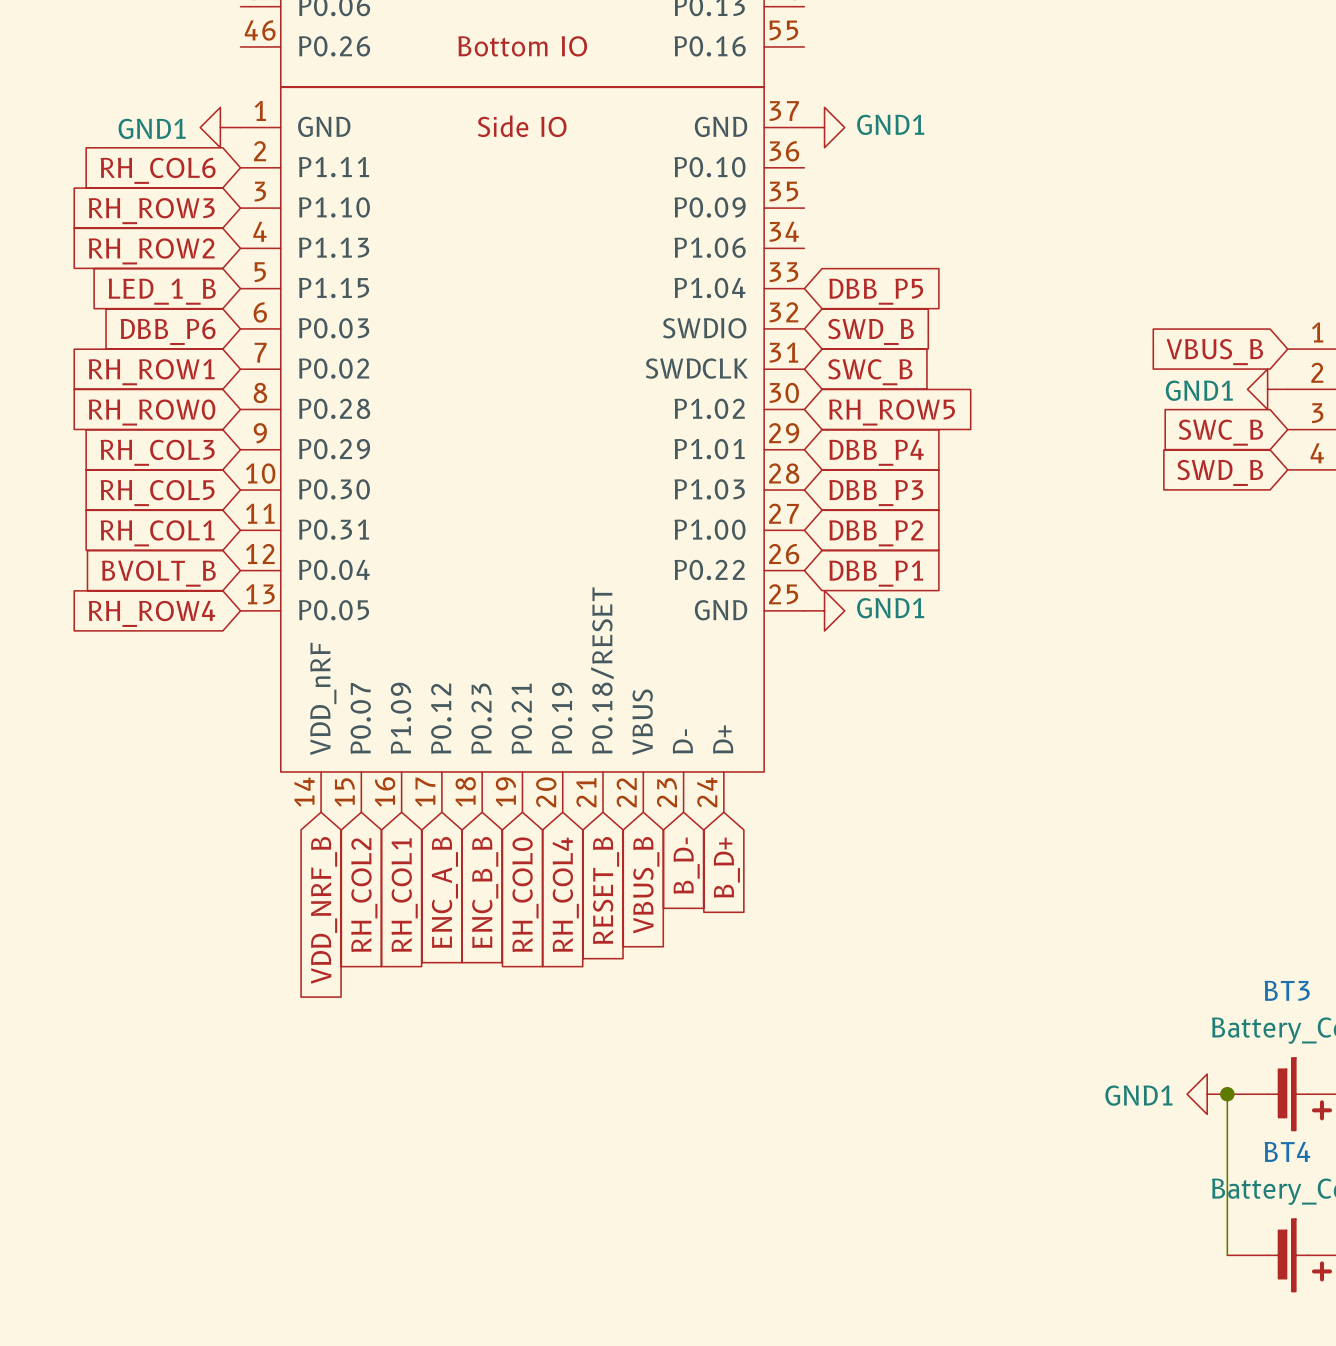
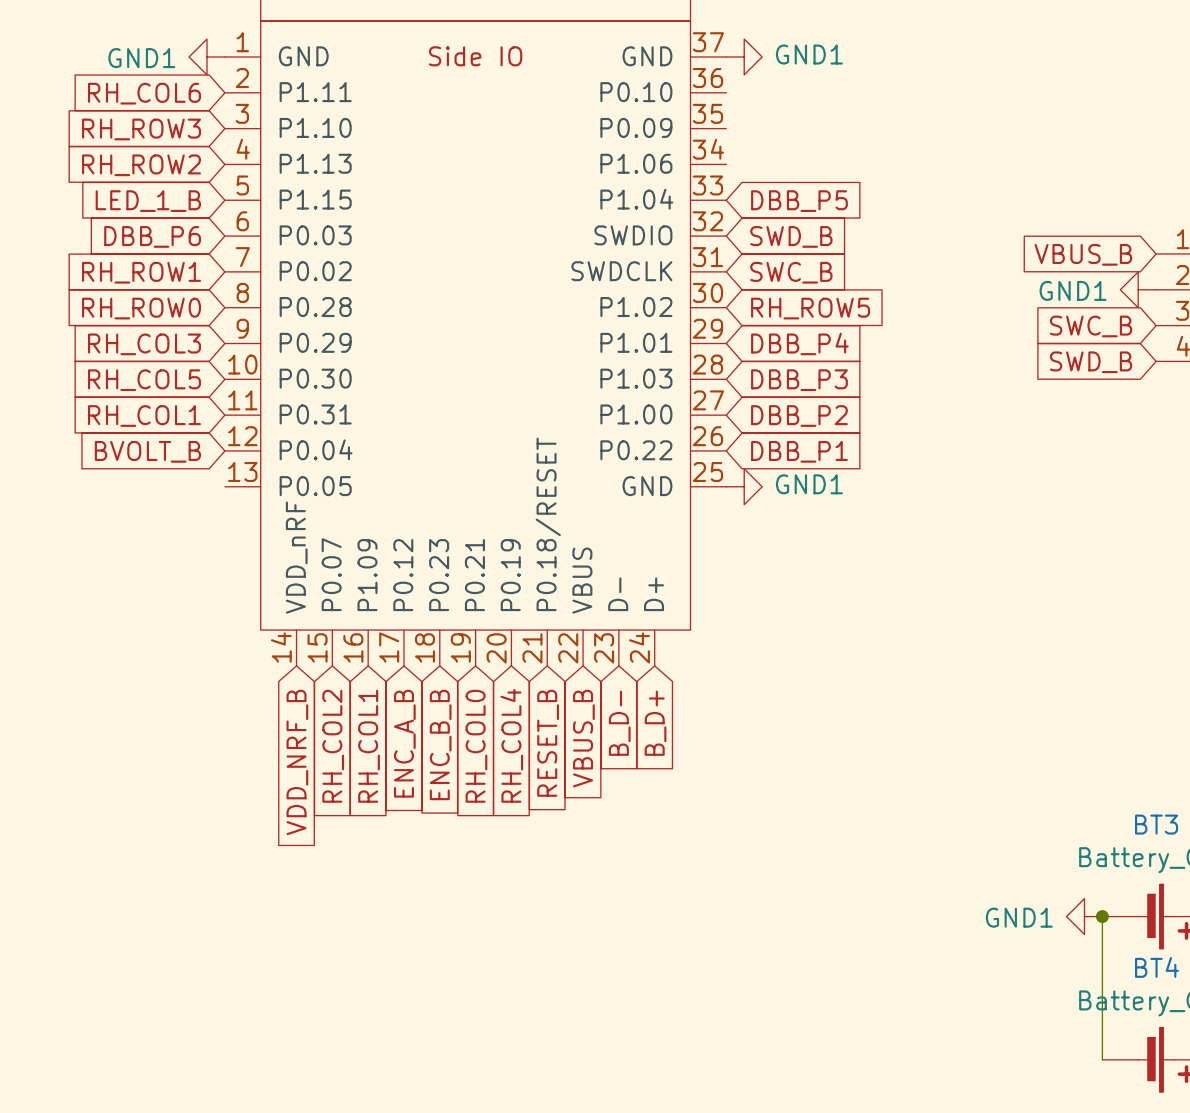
global label: RH_ROW4 (151, 613) -> none

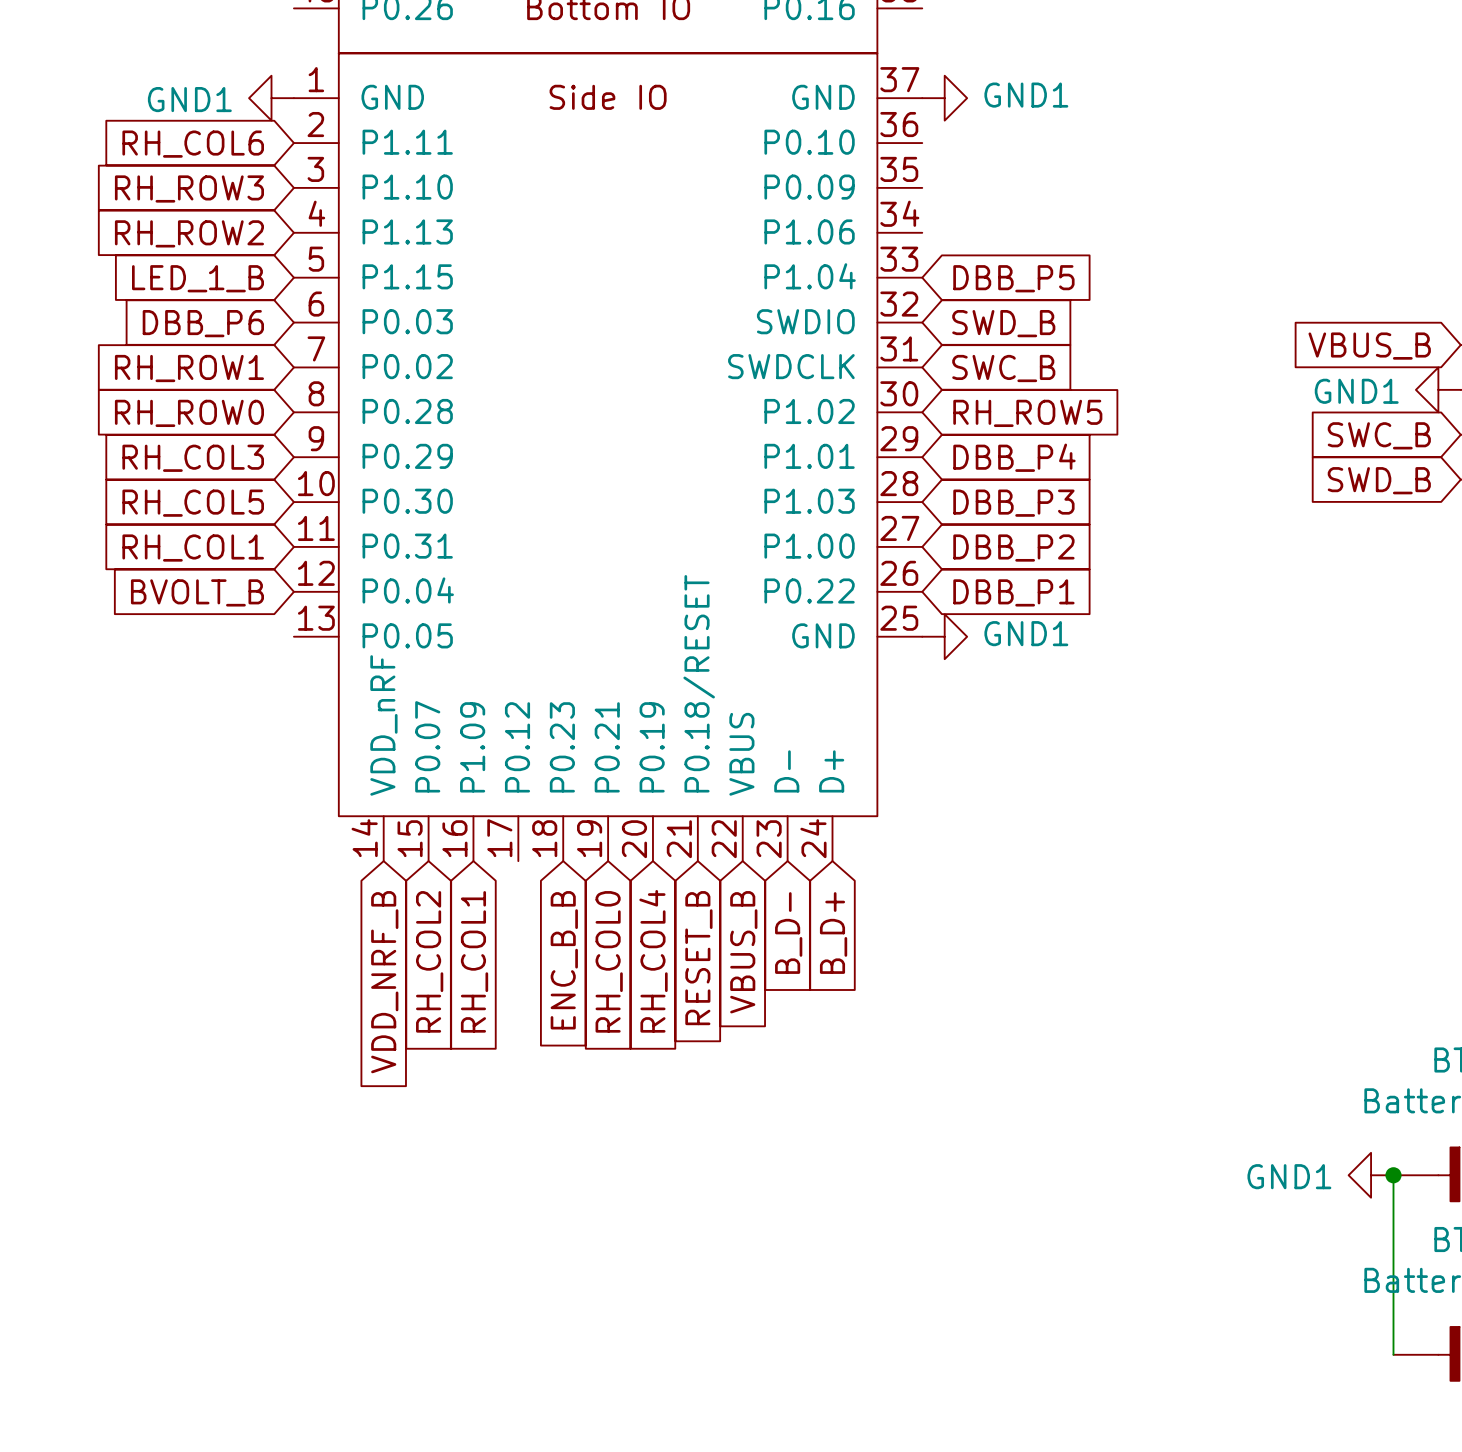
global label: ENC_A_B (404, 743) -> none

